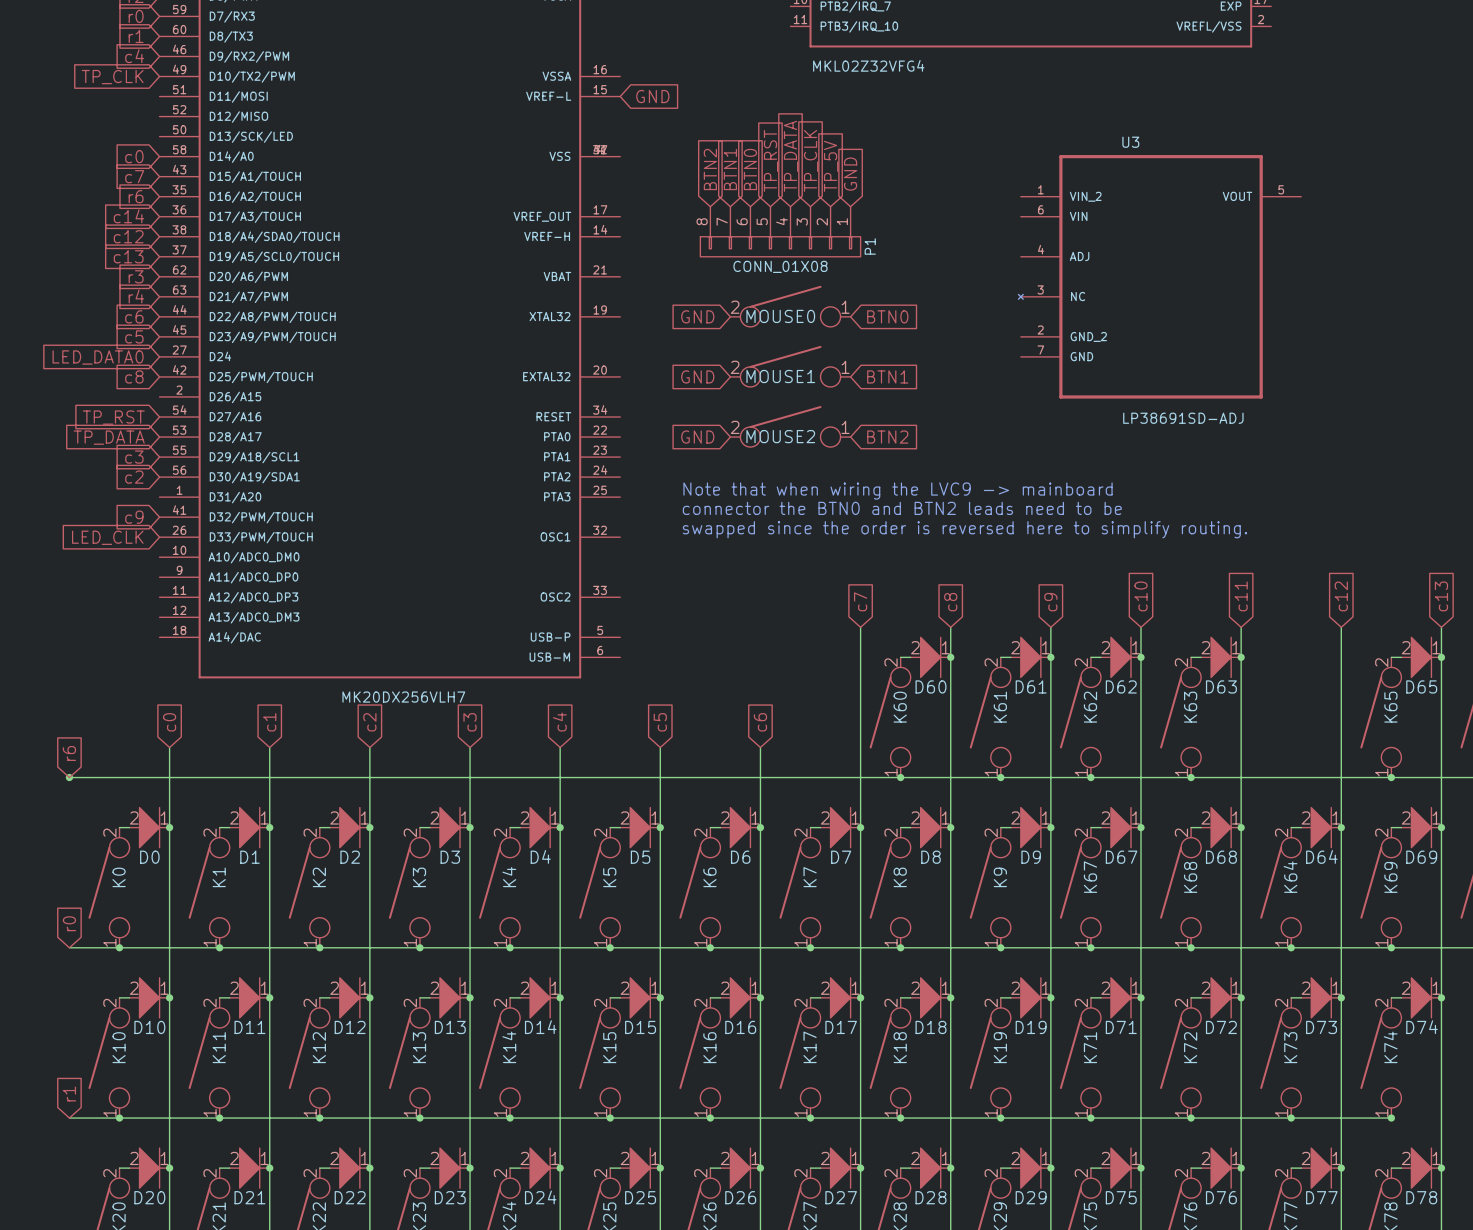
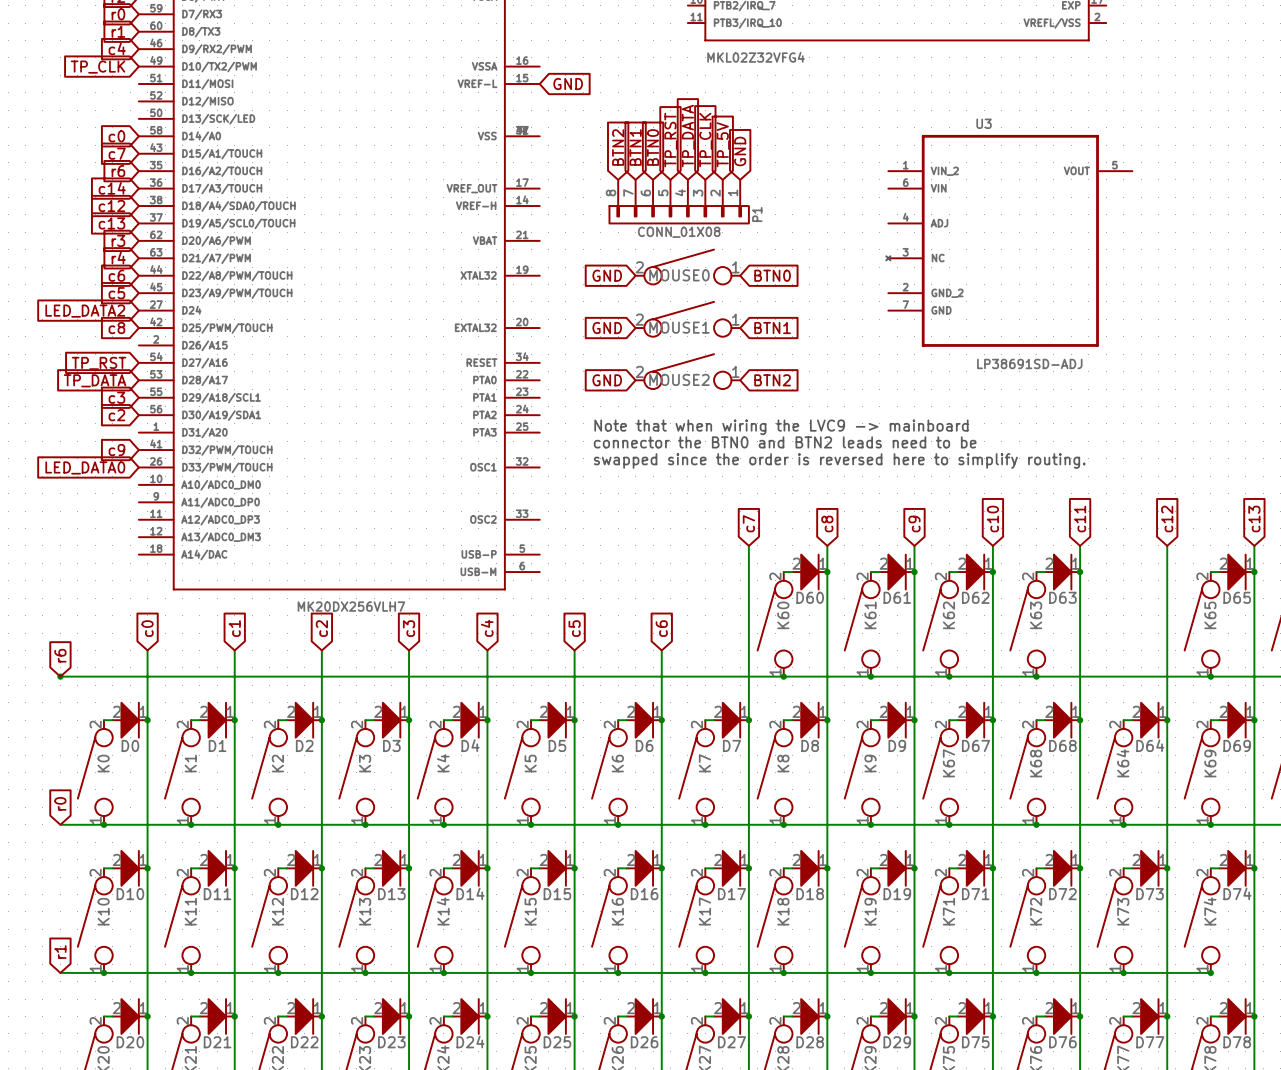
global label: LED_DATA0 (98, 357) -> LED_DATA2 (85, 311)
global label: LED_CLK (107, 537) -> LED_DATA0 (85, 467)

